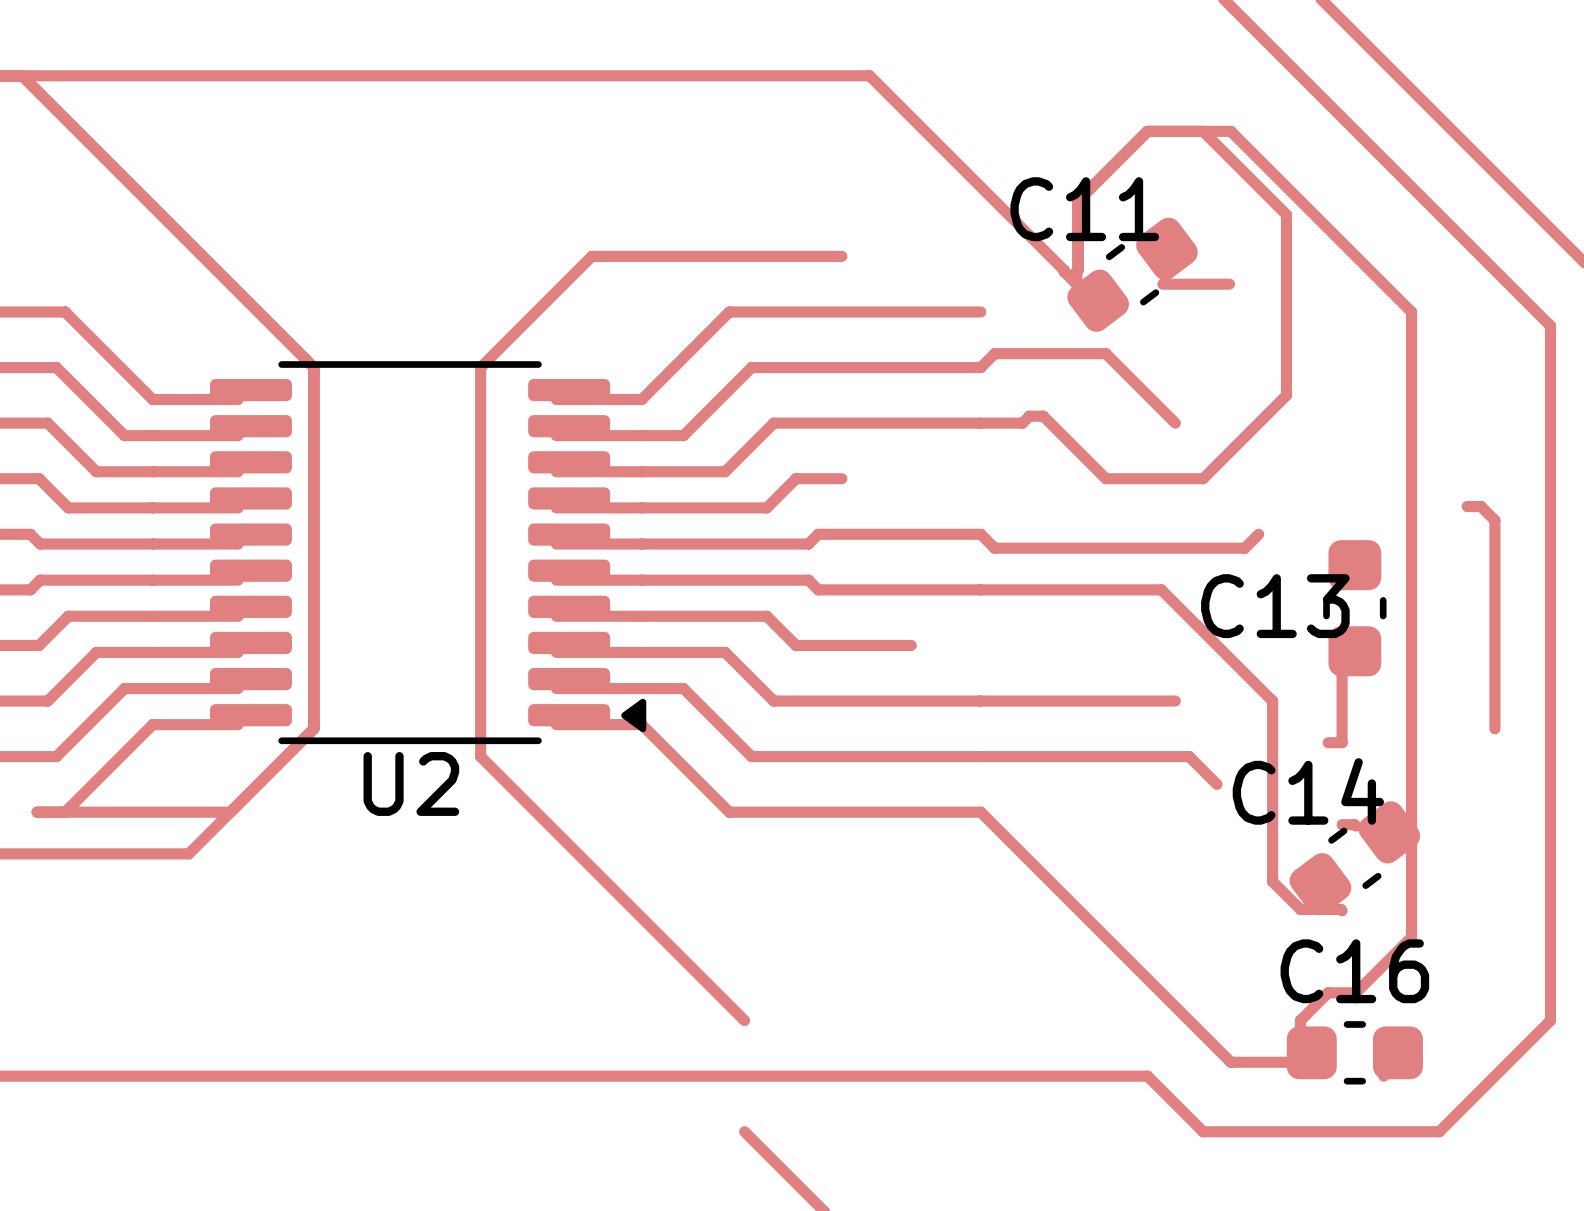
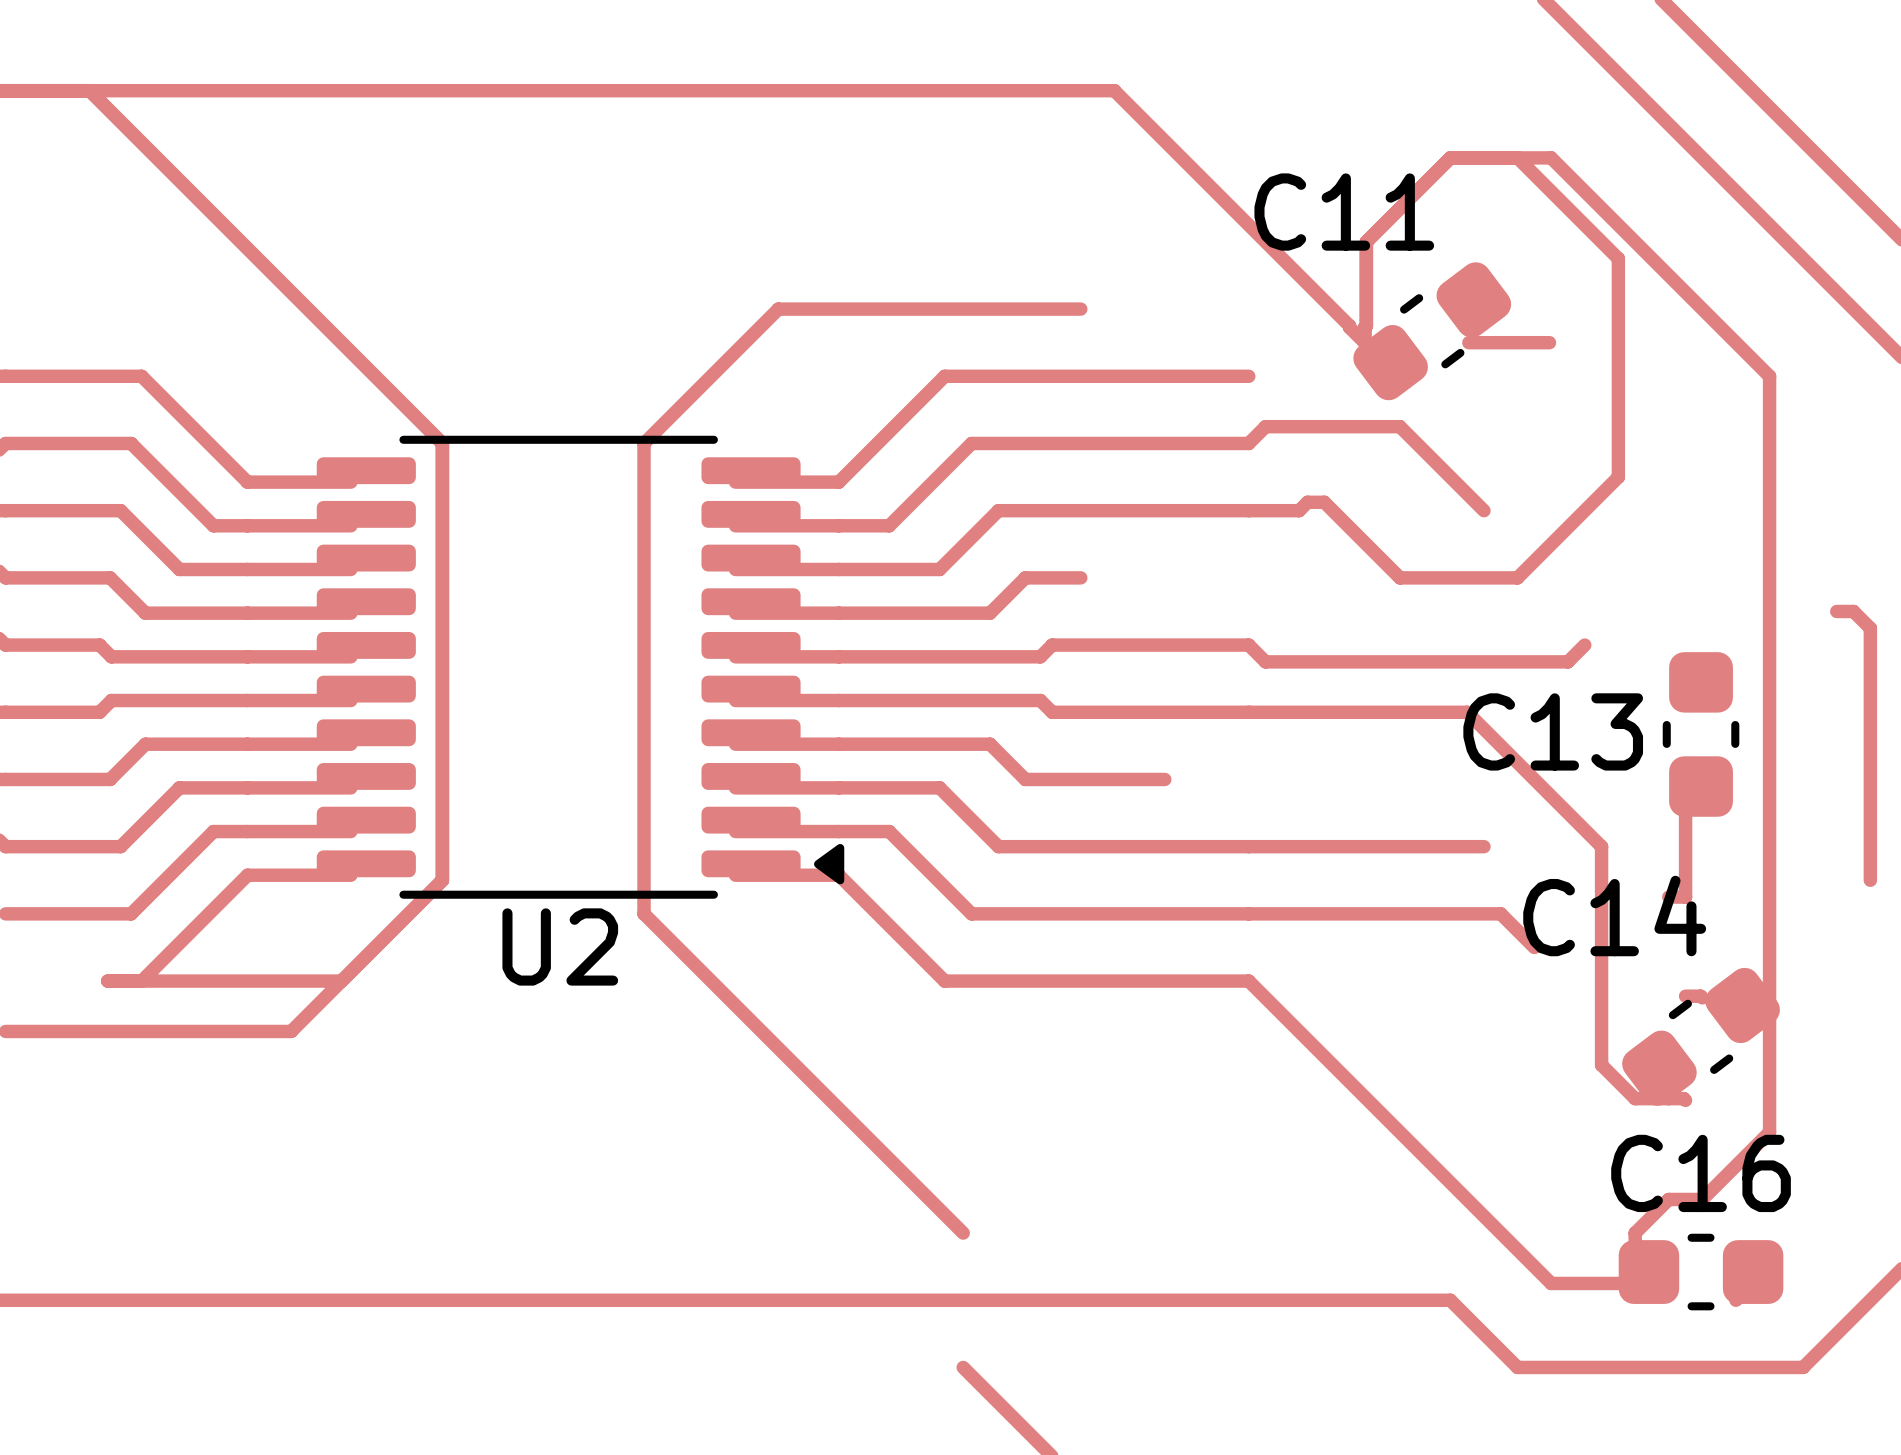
C11 name position: C11 (1084, 209) -> C11 (1344, 212)
C13 name position: C13 (1275, 606) -> C13 (1553, 731)
C14 name position: C14 (1308, 791) -> C14 (1614, 916)

